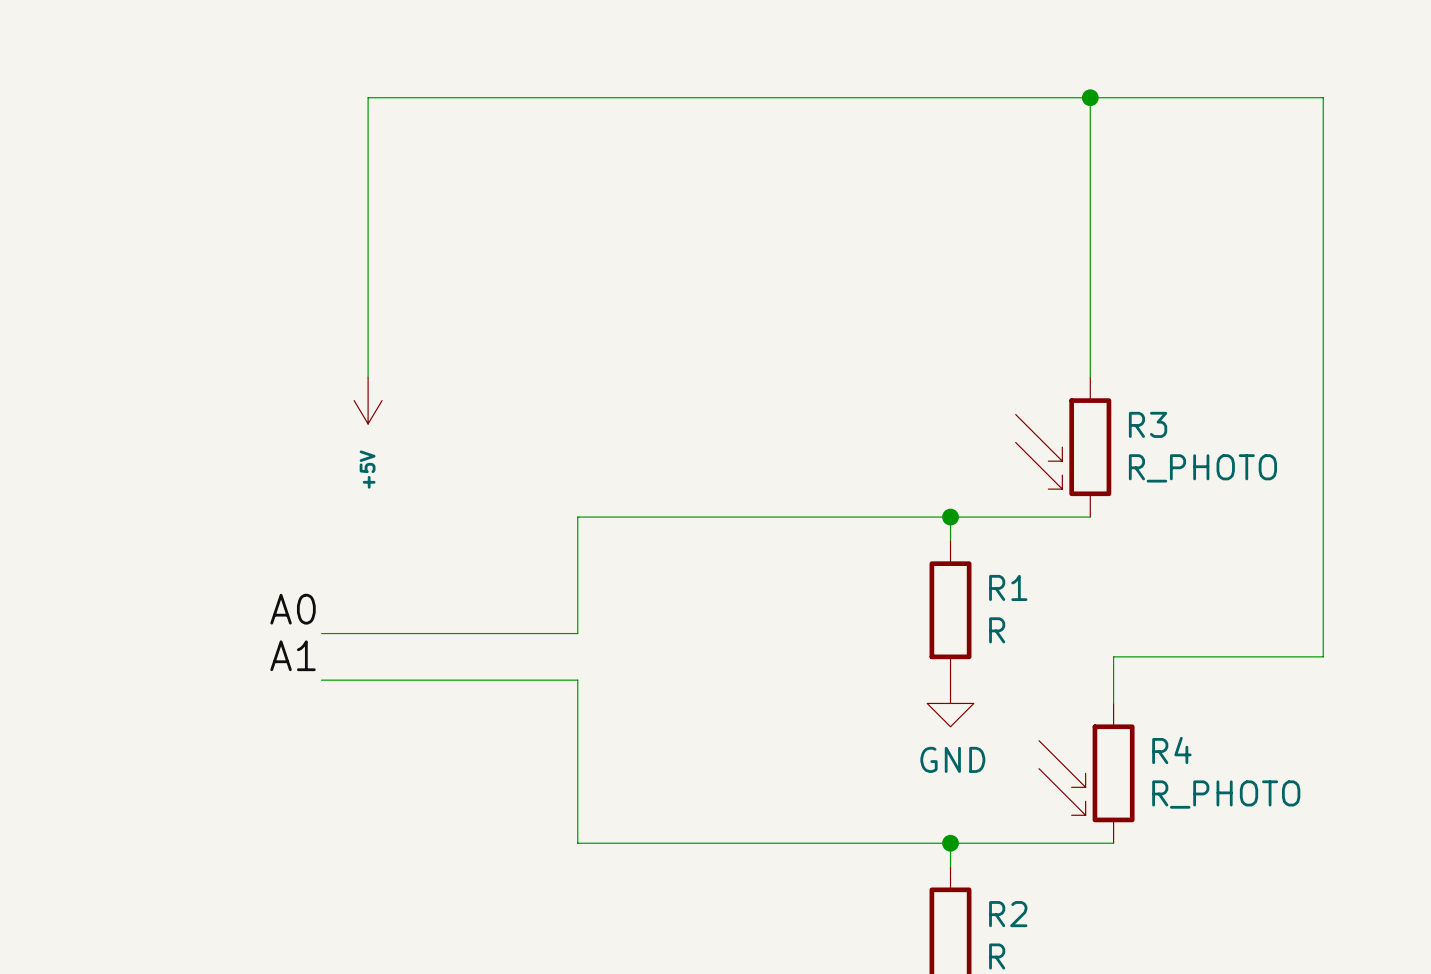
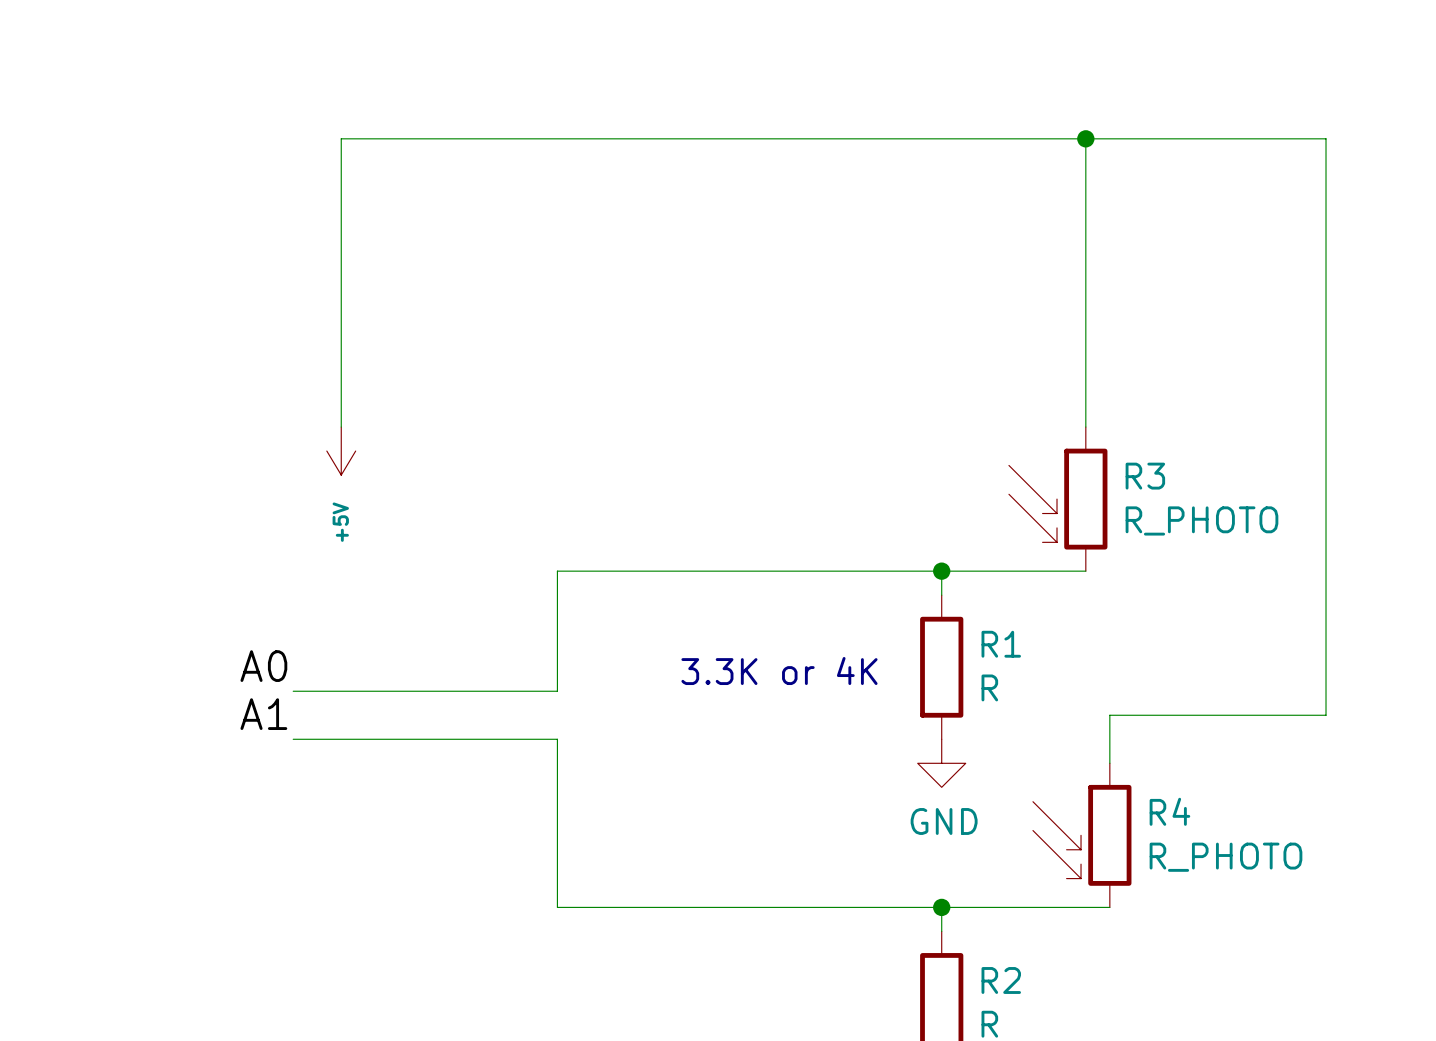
text: none -> 3.3K or 4K (779, 671)

